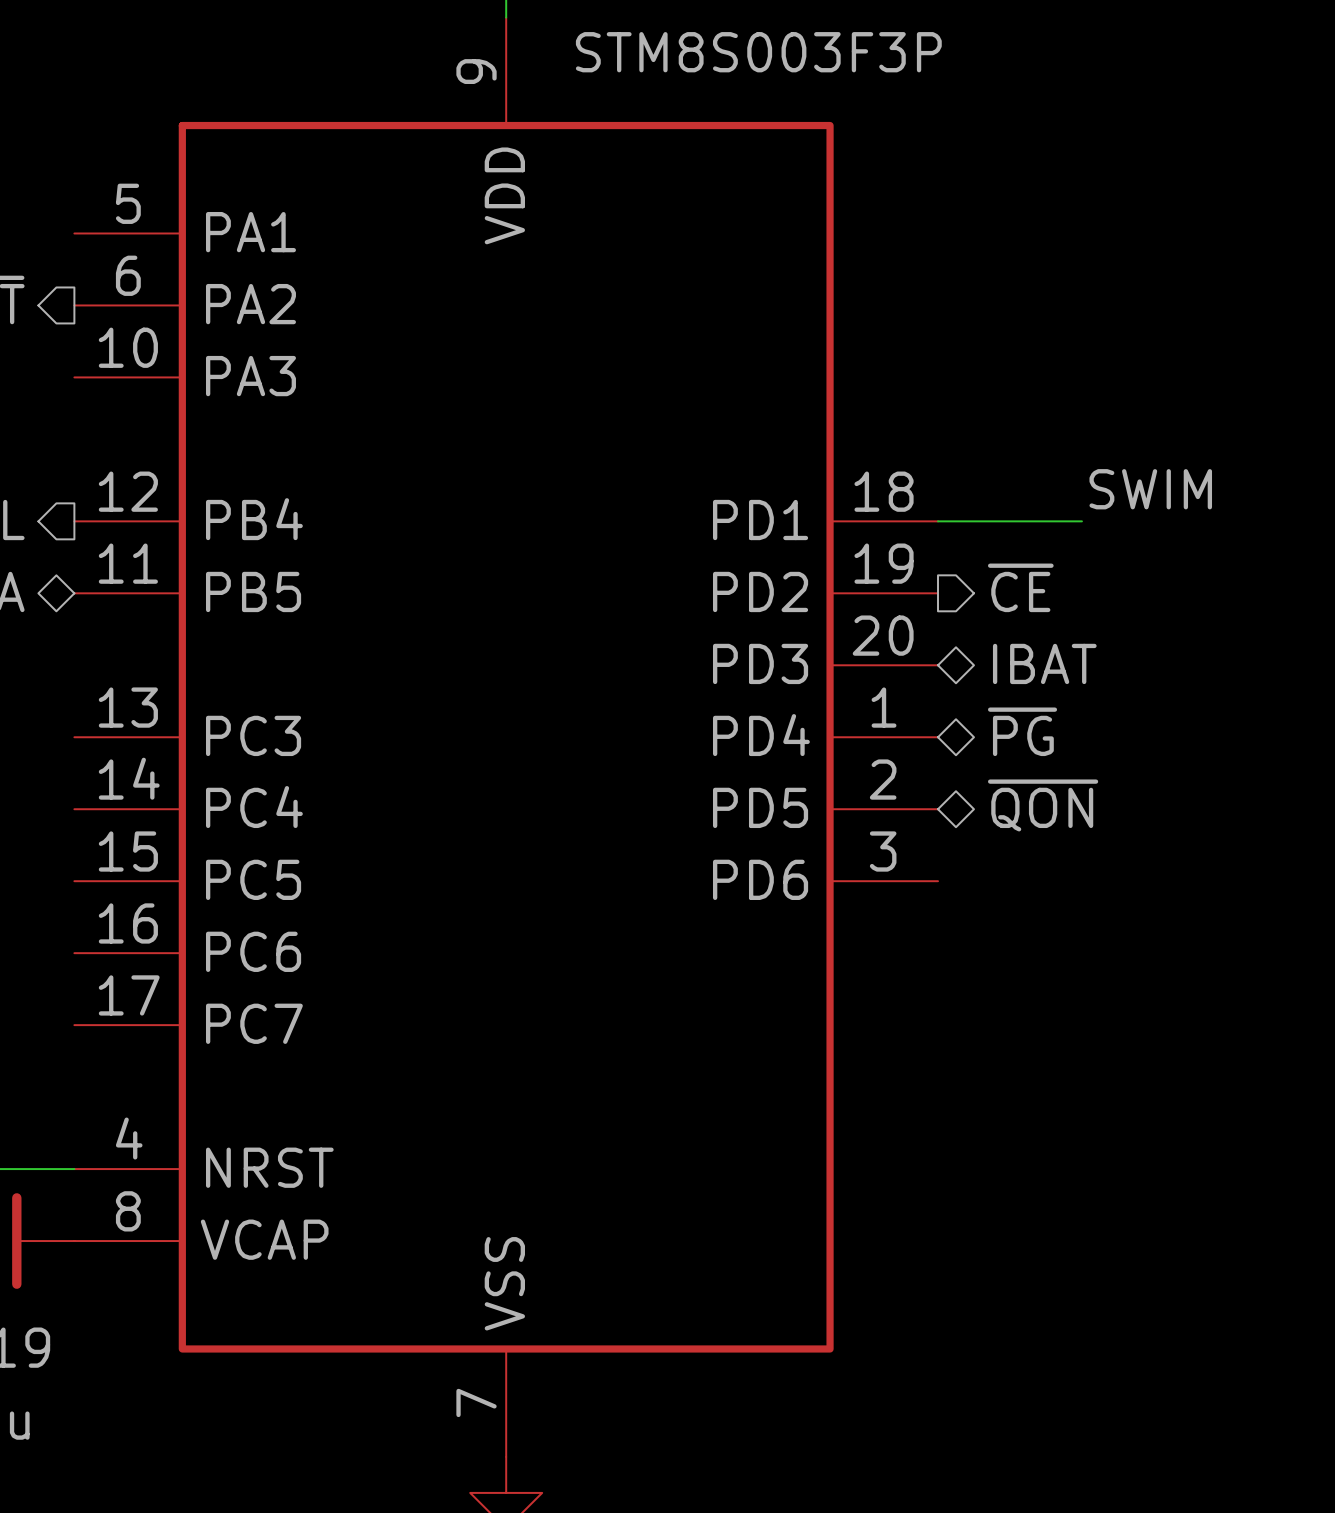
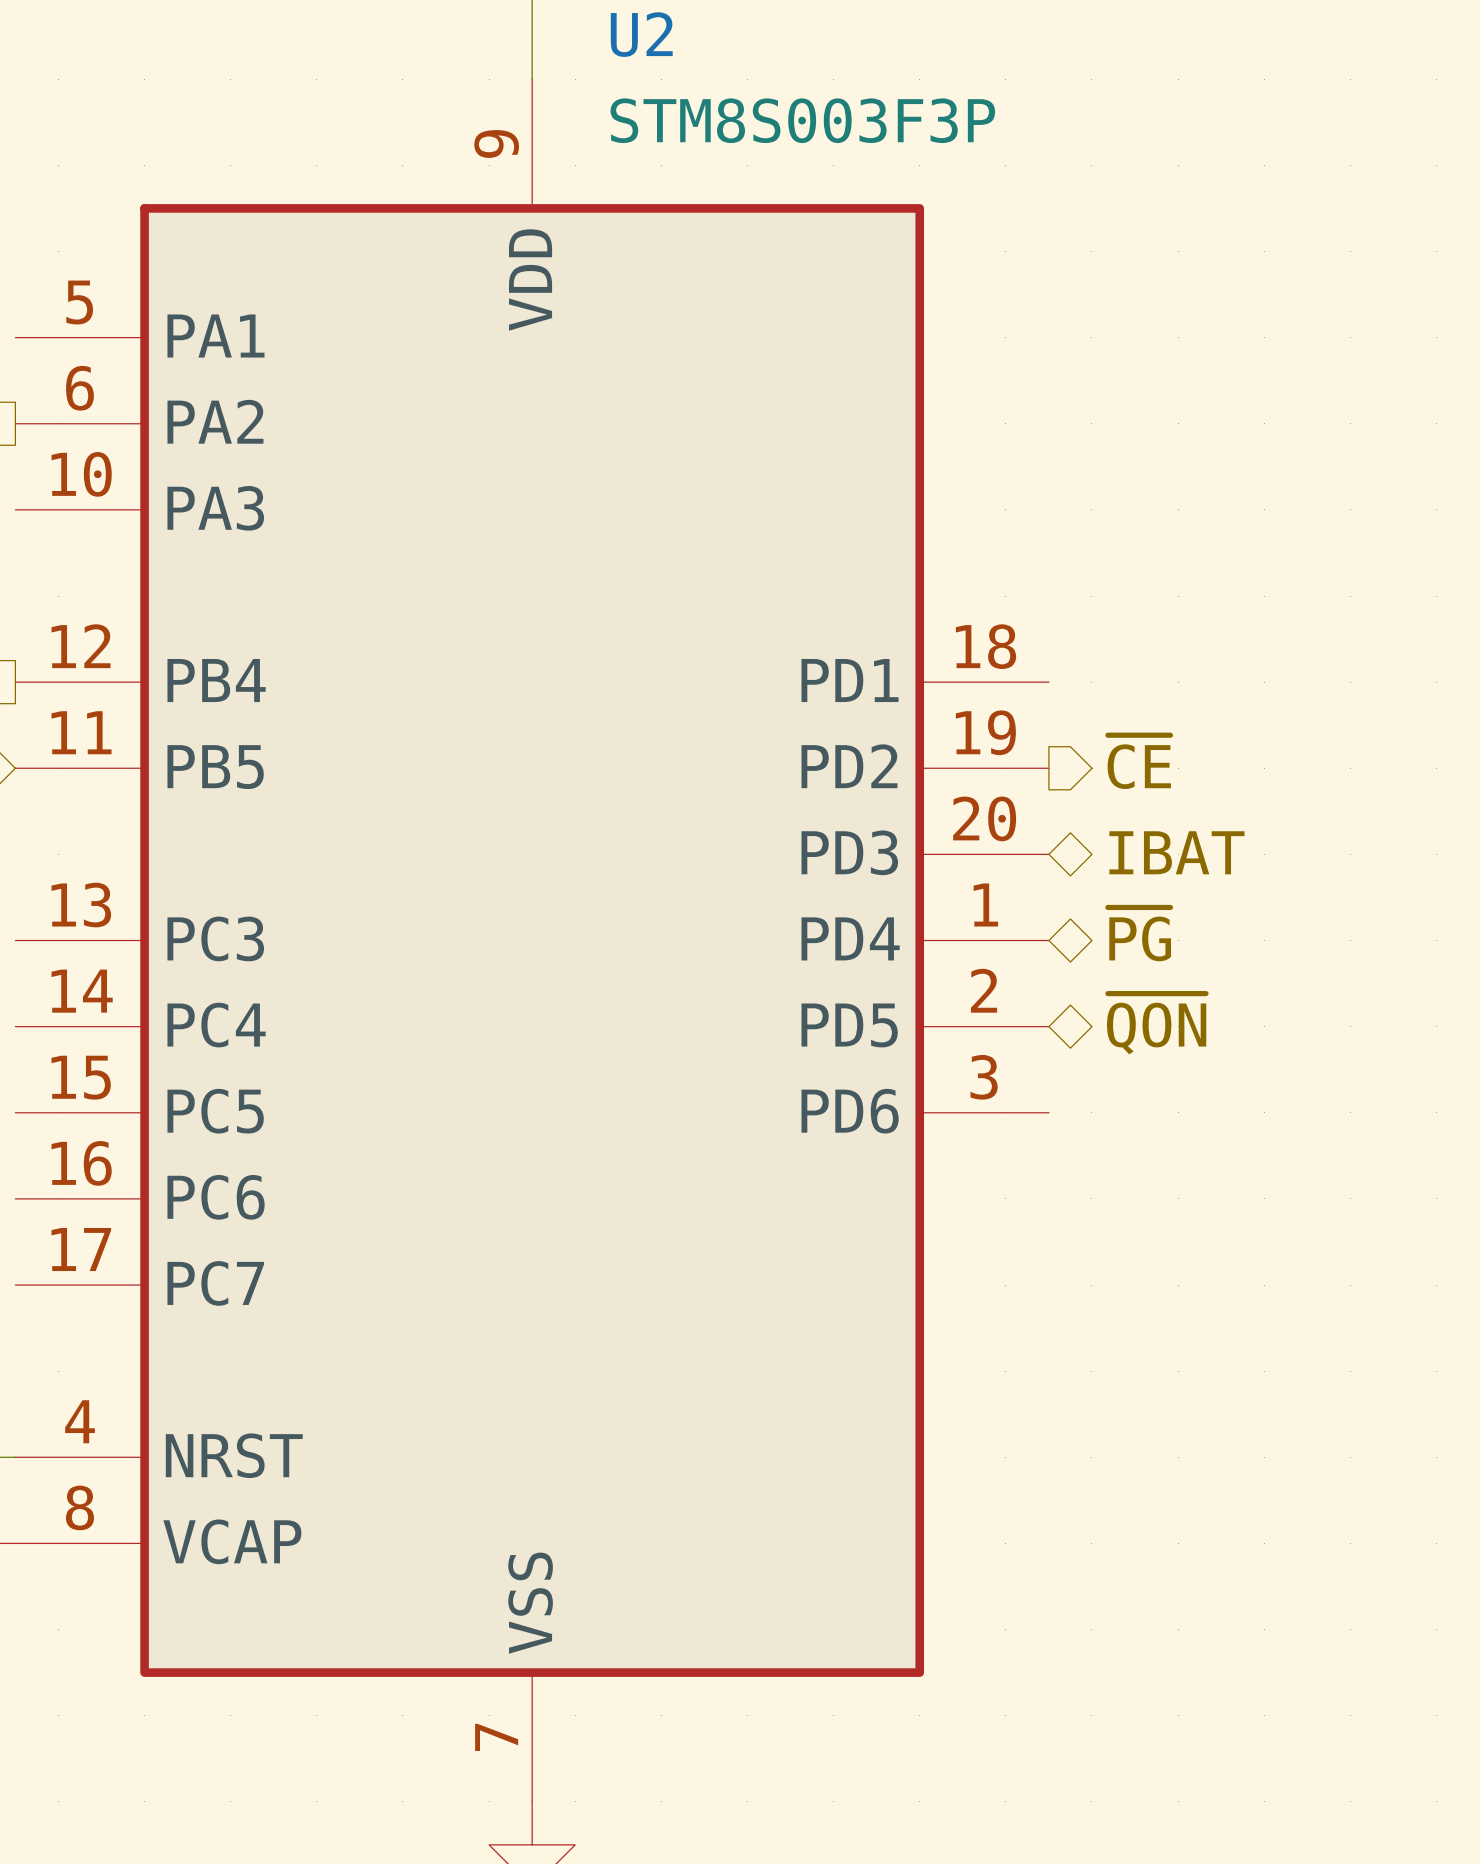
label: SWIM (1150, 489) -> none
wire: (938, 521) (1081, 521) -> none

